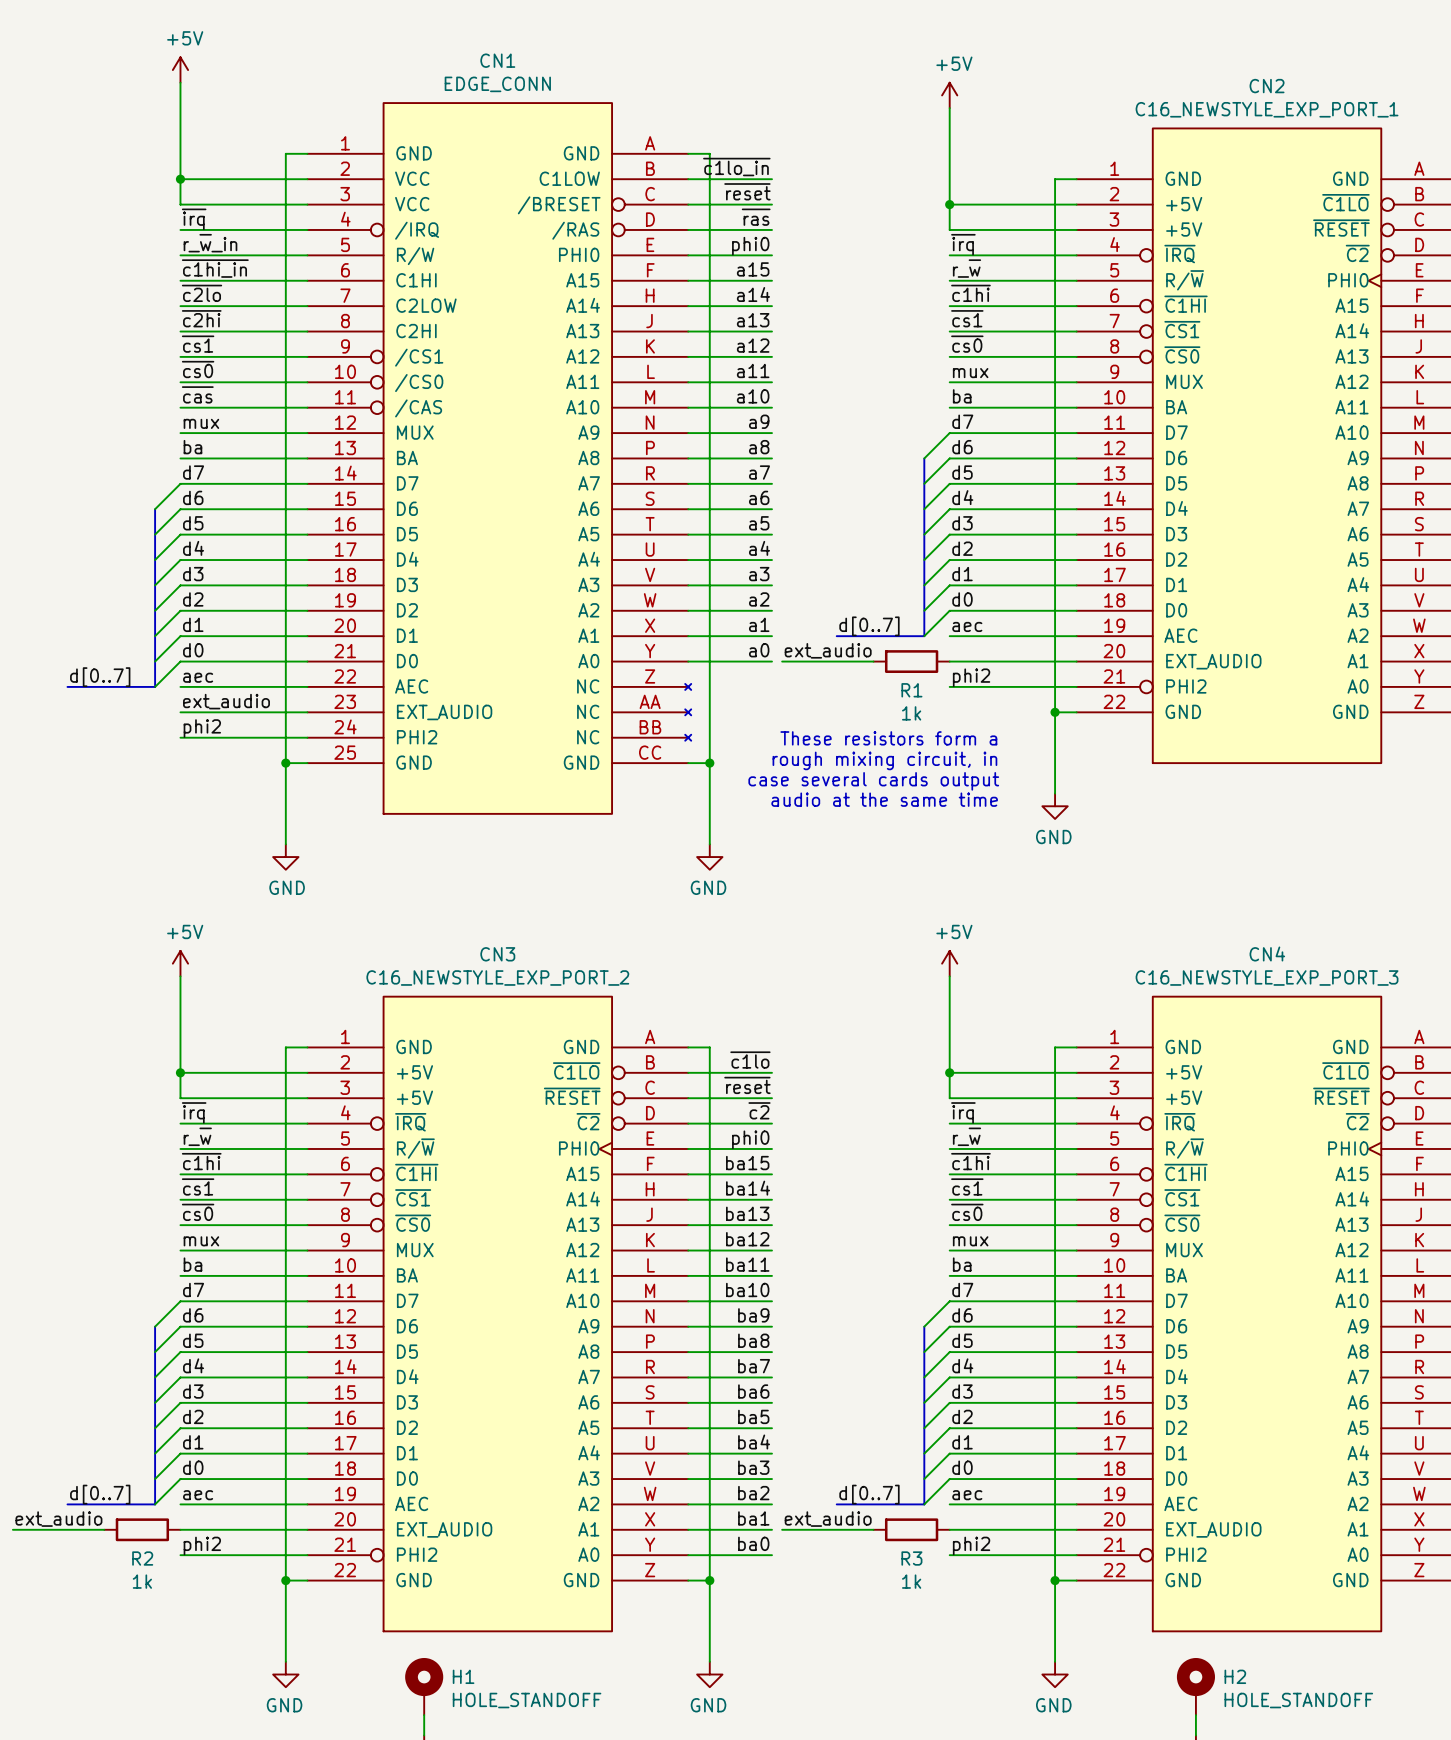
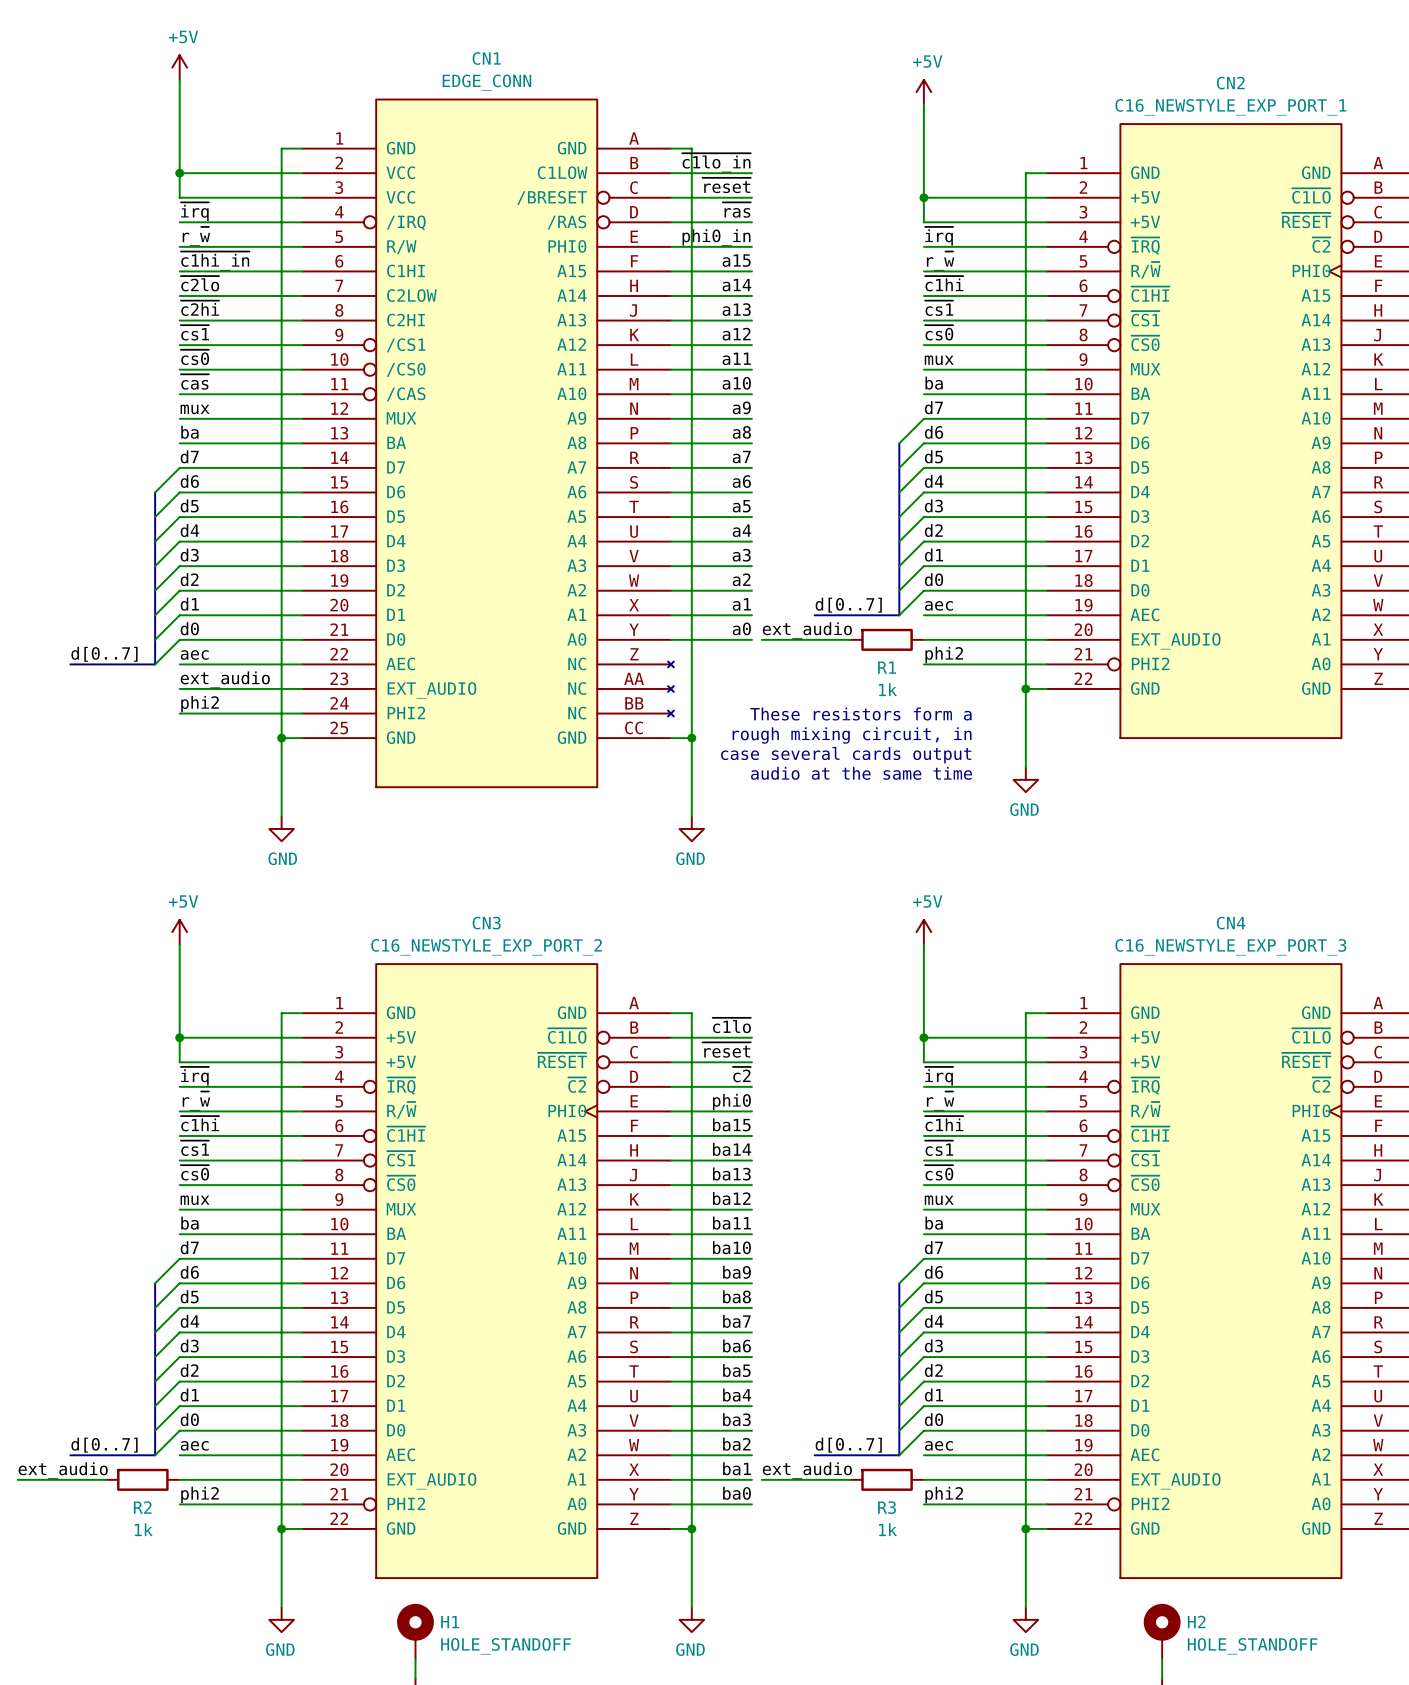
label: r_~{w}_in (210, 243) -> r_~{w} (196, 236)
label: phi0 (750, 246) -> phi0_in (716, 237)

